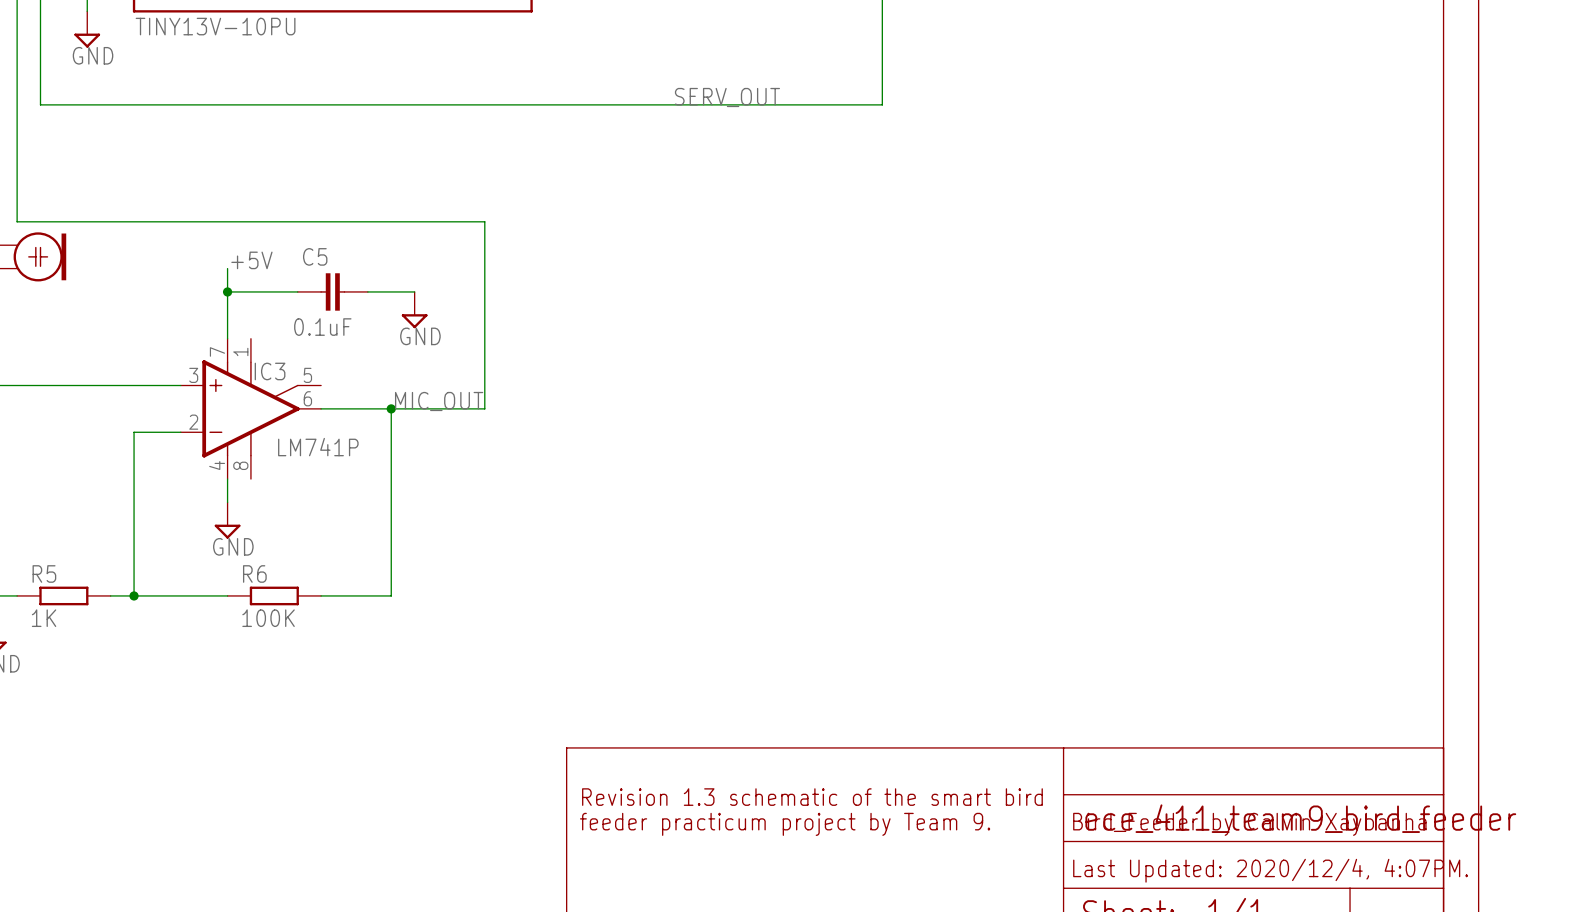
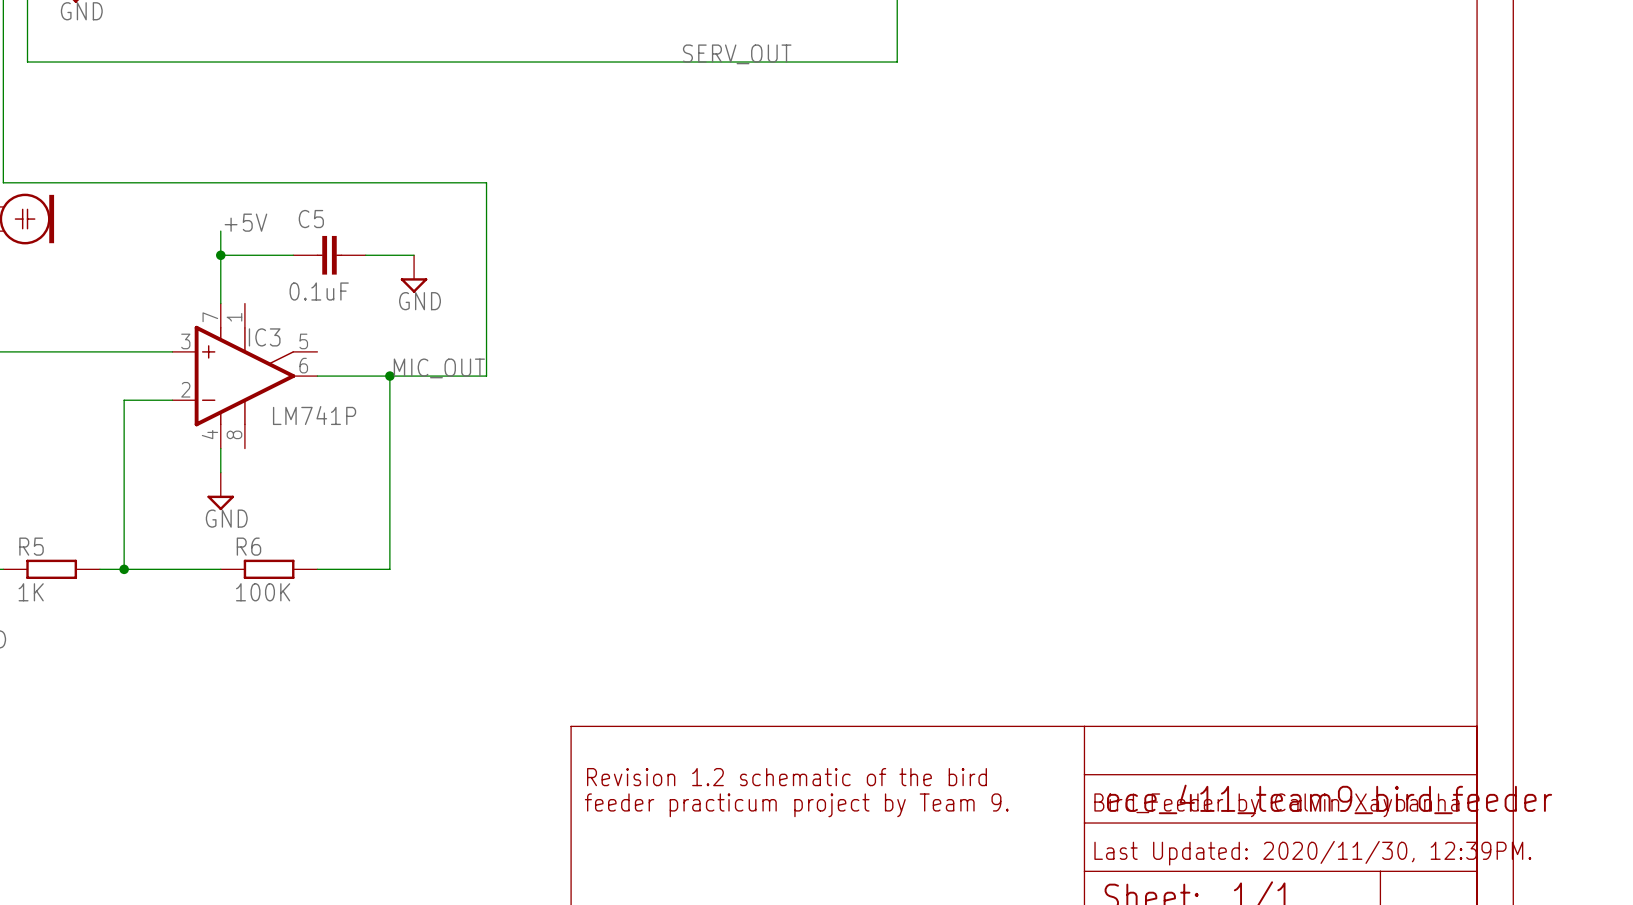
text: Revision 1.3 schematic of the smart bird (812, 797) -> Revision 1.2 schematic of the bird (786, 777)
text: Last Updated: 2020/12/4, 4:07PM. (1270, 870) -> Last Updated: 2020/11/30, 12:39PM. (1312, 853)

